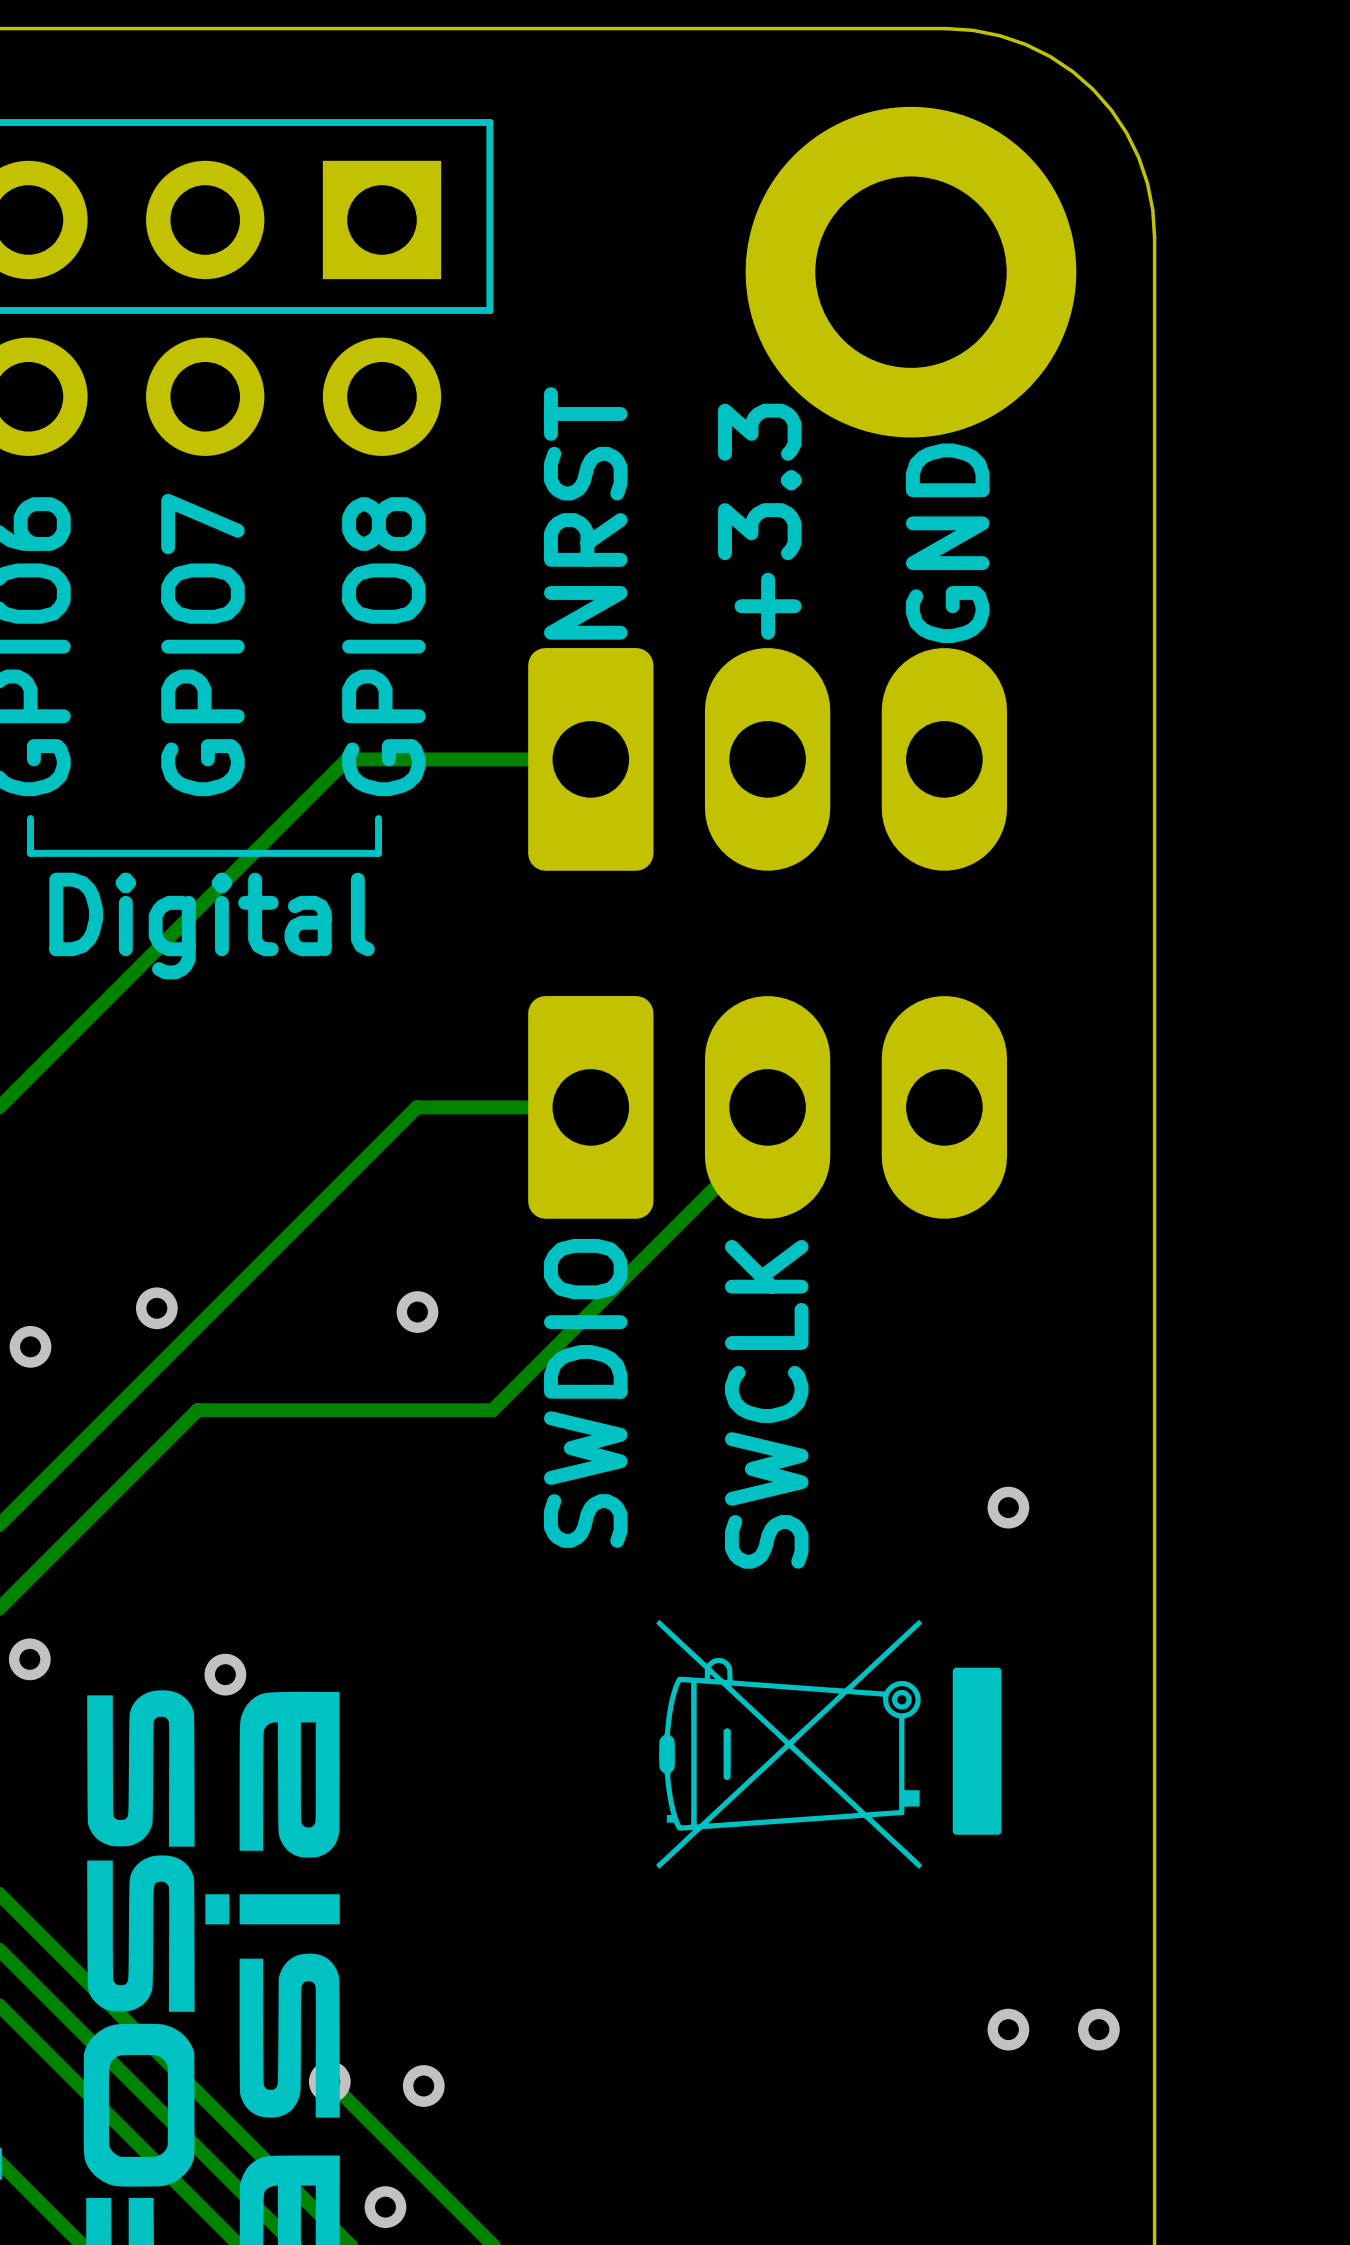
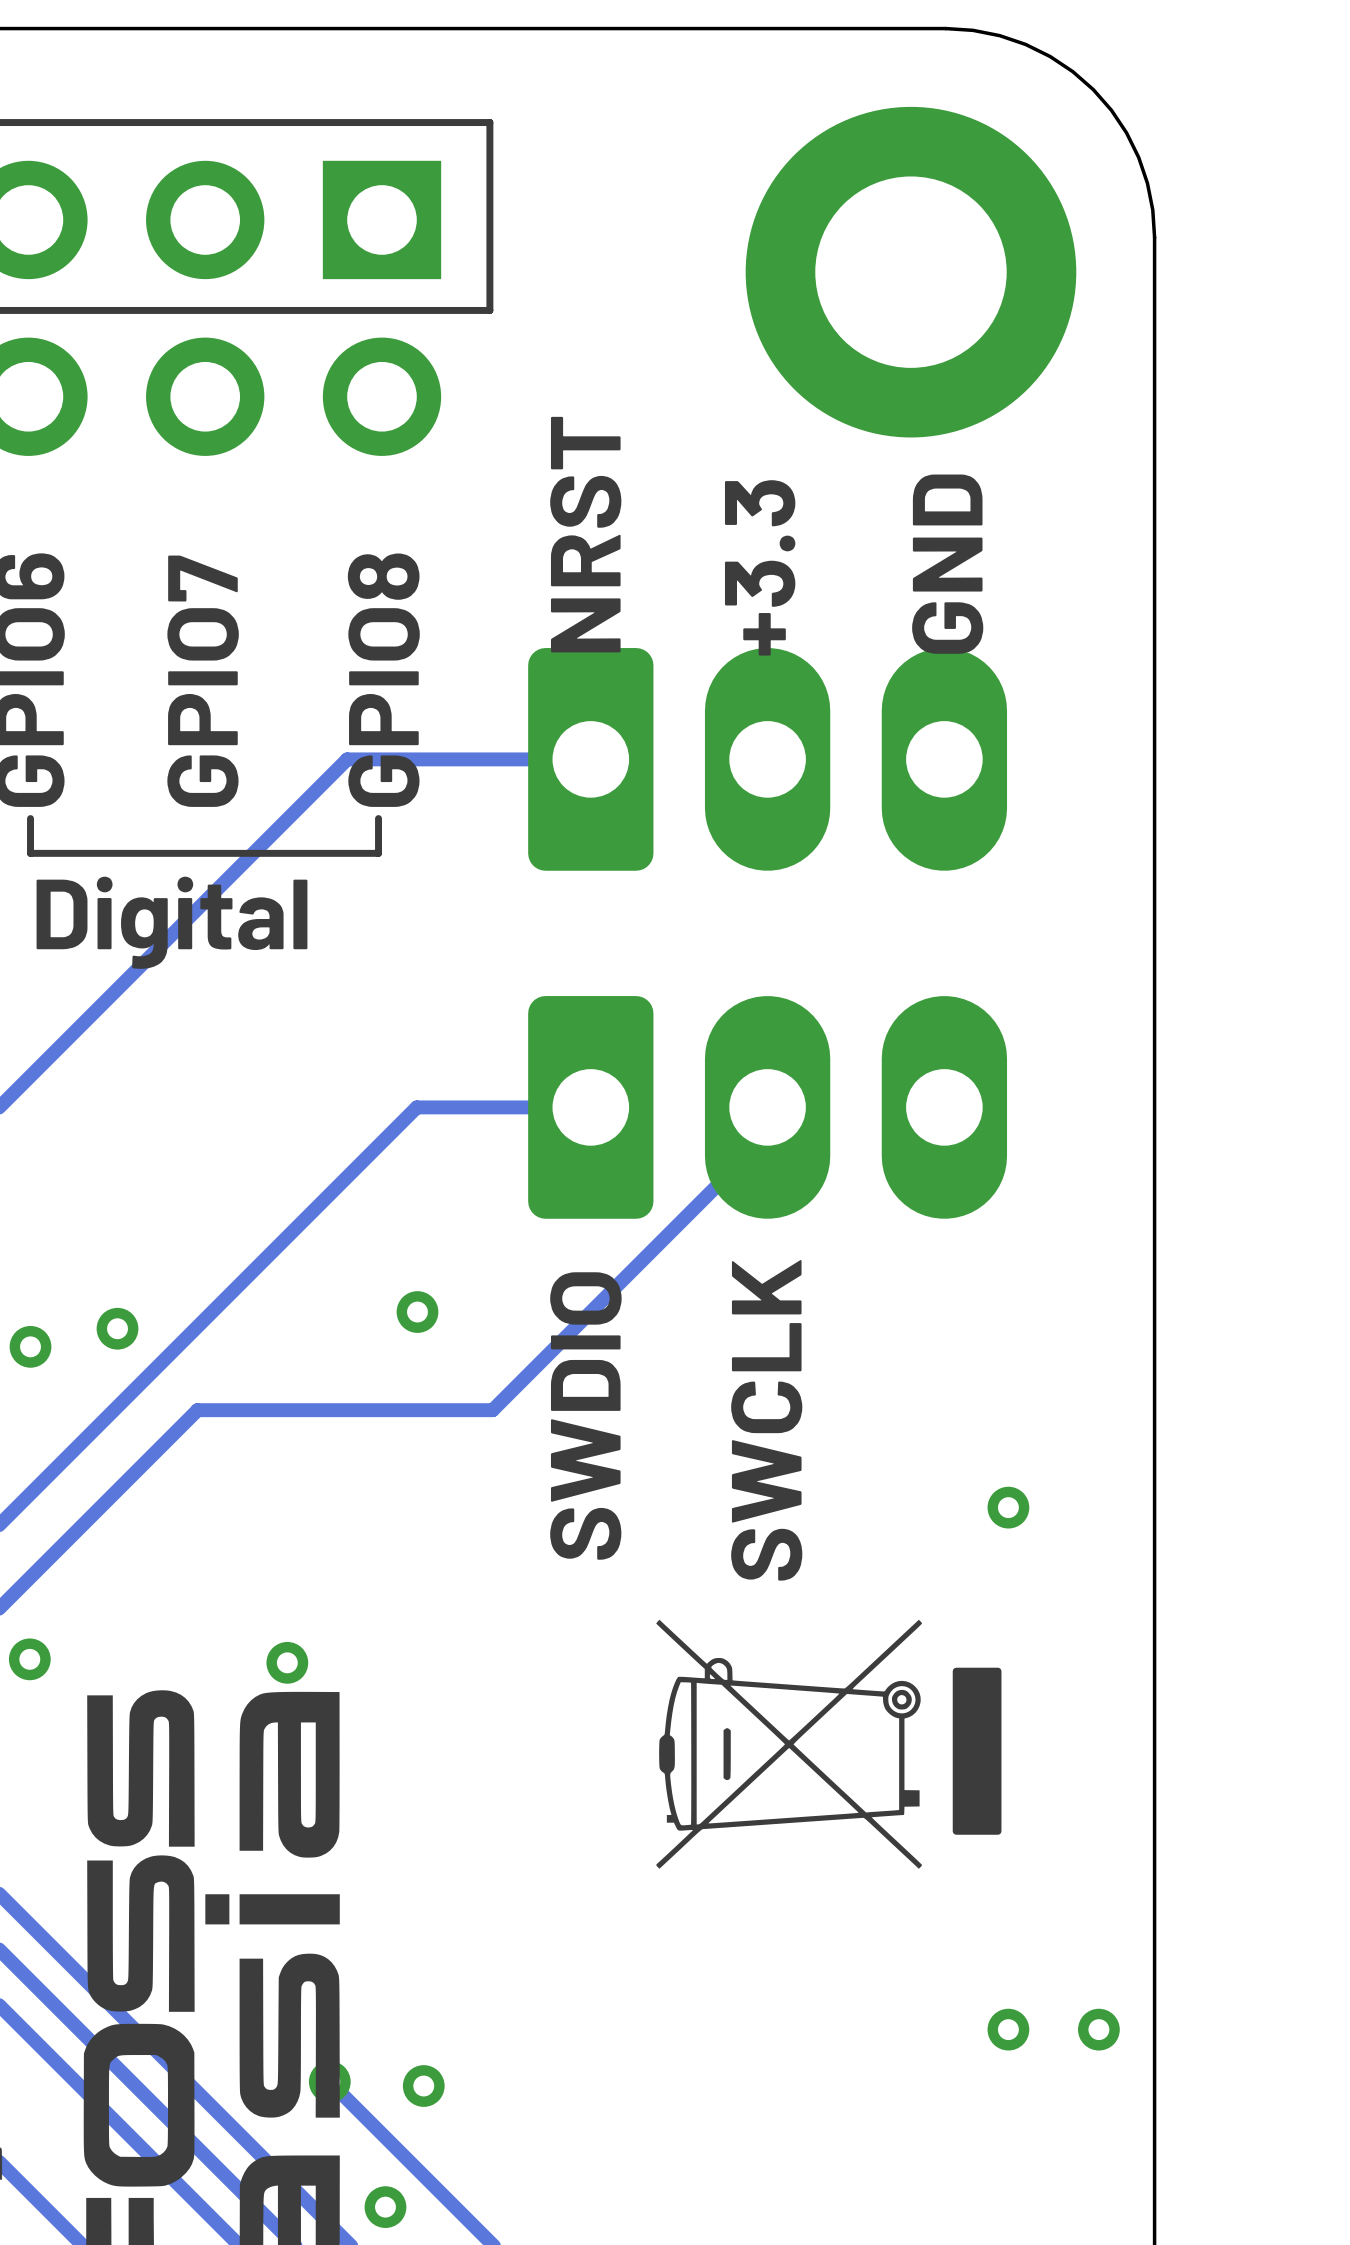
via position: (156, 1308) -> (117, 1328)
via position: (225, 1674) -> (287, 1662)

